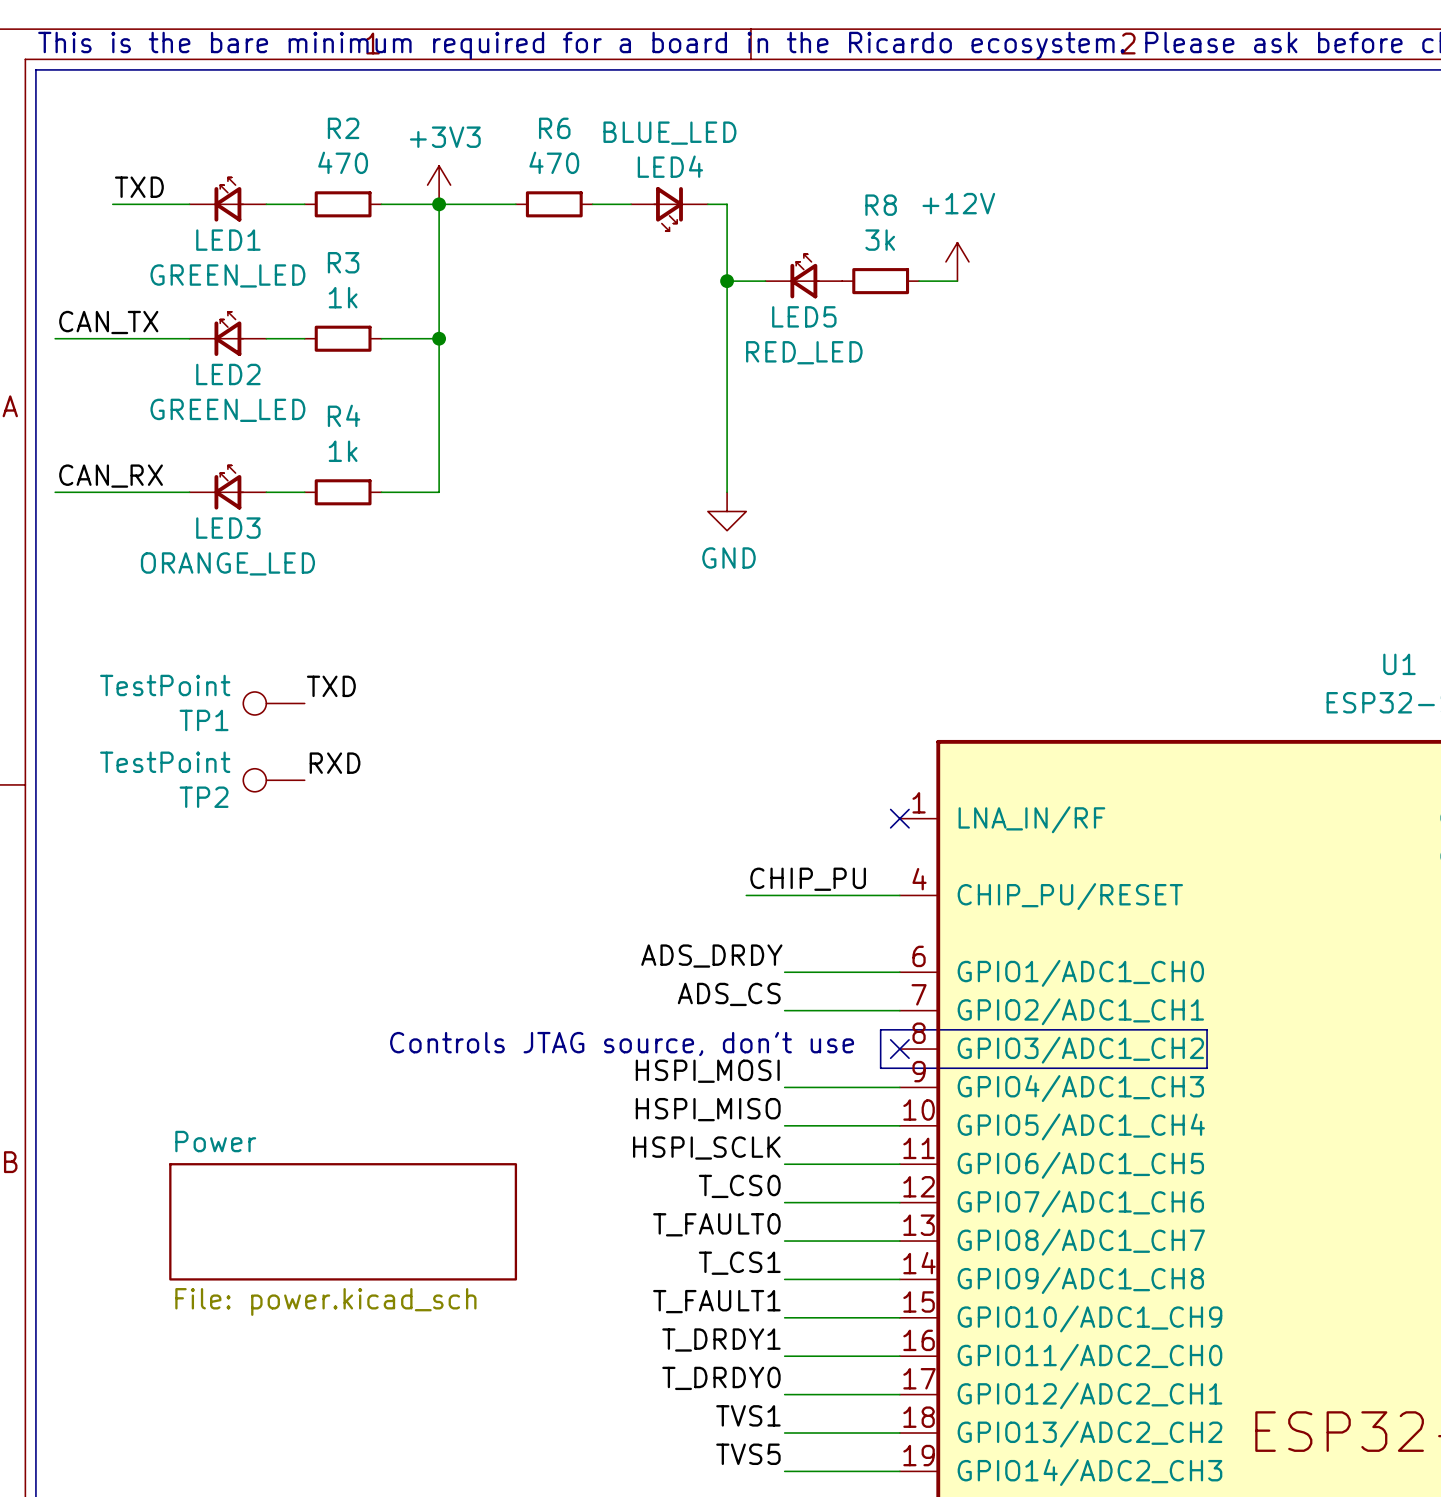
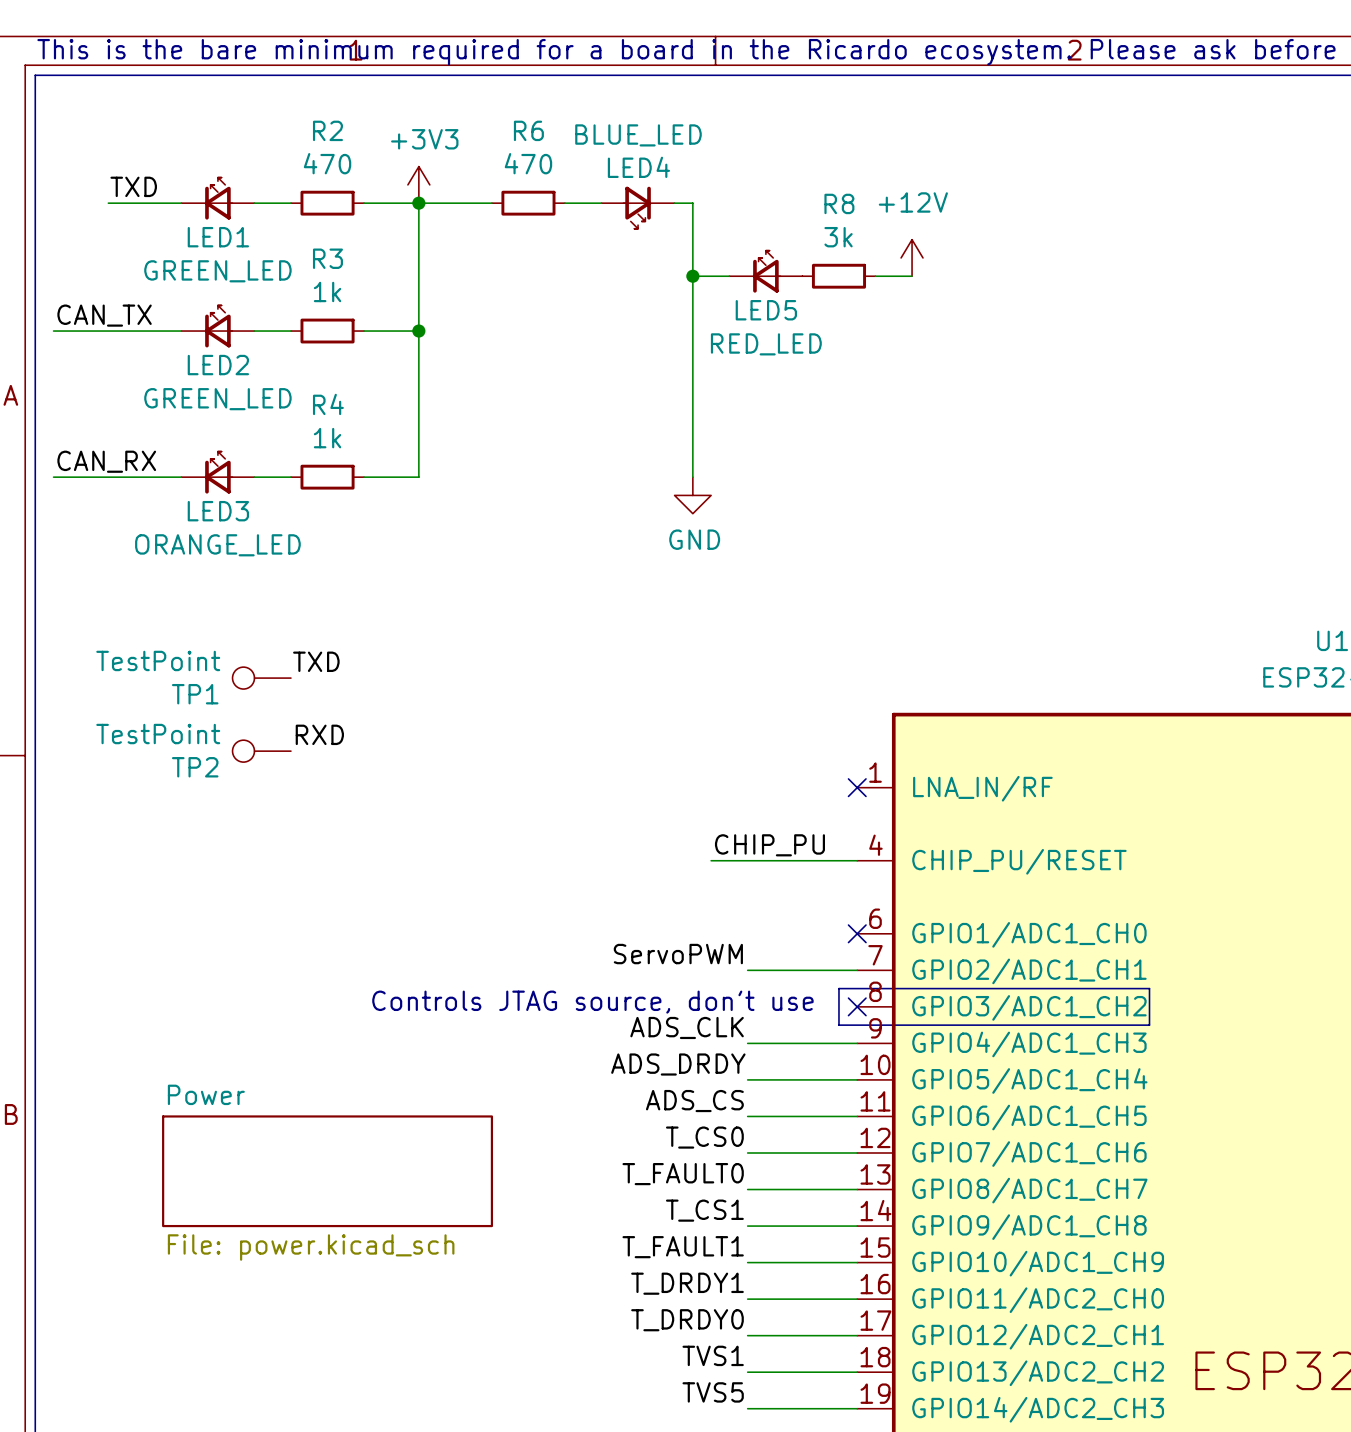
label: ADS_DRDY (711, 956) -> none
wire: (784, 972) (899, 972) -> none
no-connect mark: none -> (857, 933)
label: ADS_CS (729, 994) -> ServoPWM (678, 954)
label: HSPI_MOSI (707, 1071) -> ADS_CLK (687, 1027)
label: HSPI_MISO (708, 1109) -> ADS_DRDY (678, 1064)
label: HSPI_SCLK (706, 1148) -> ADS_CS (694, 1101)

